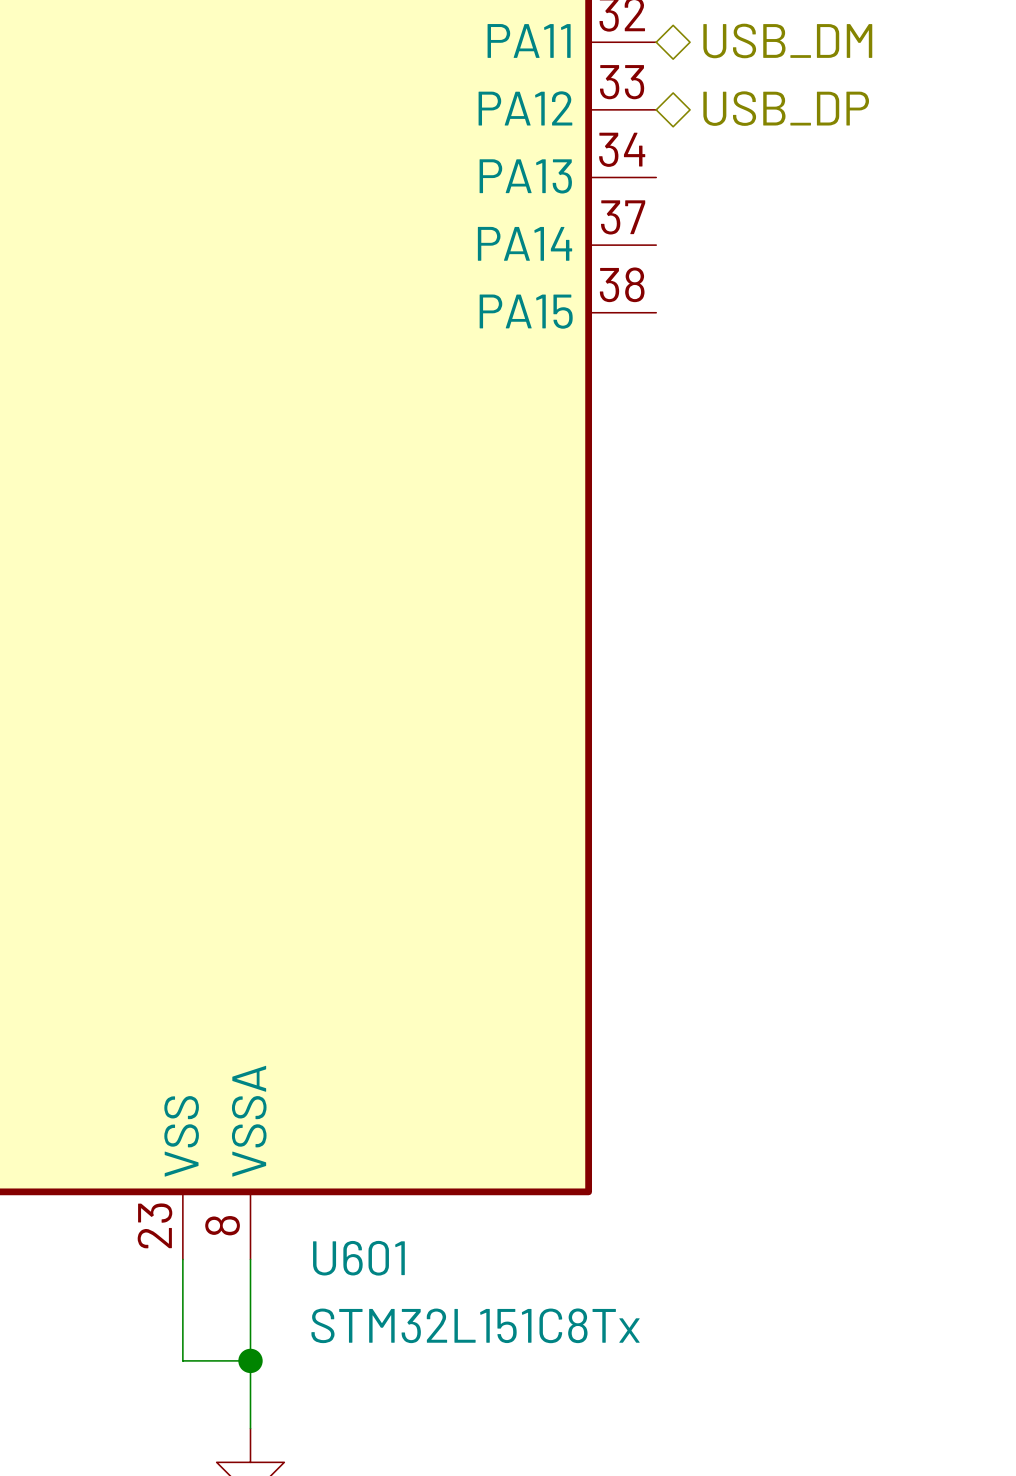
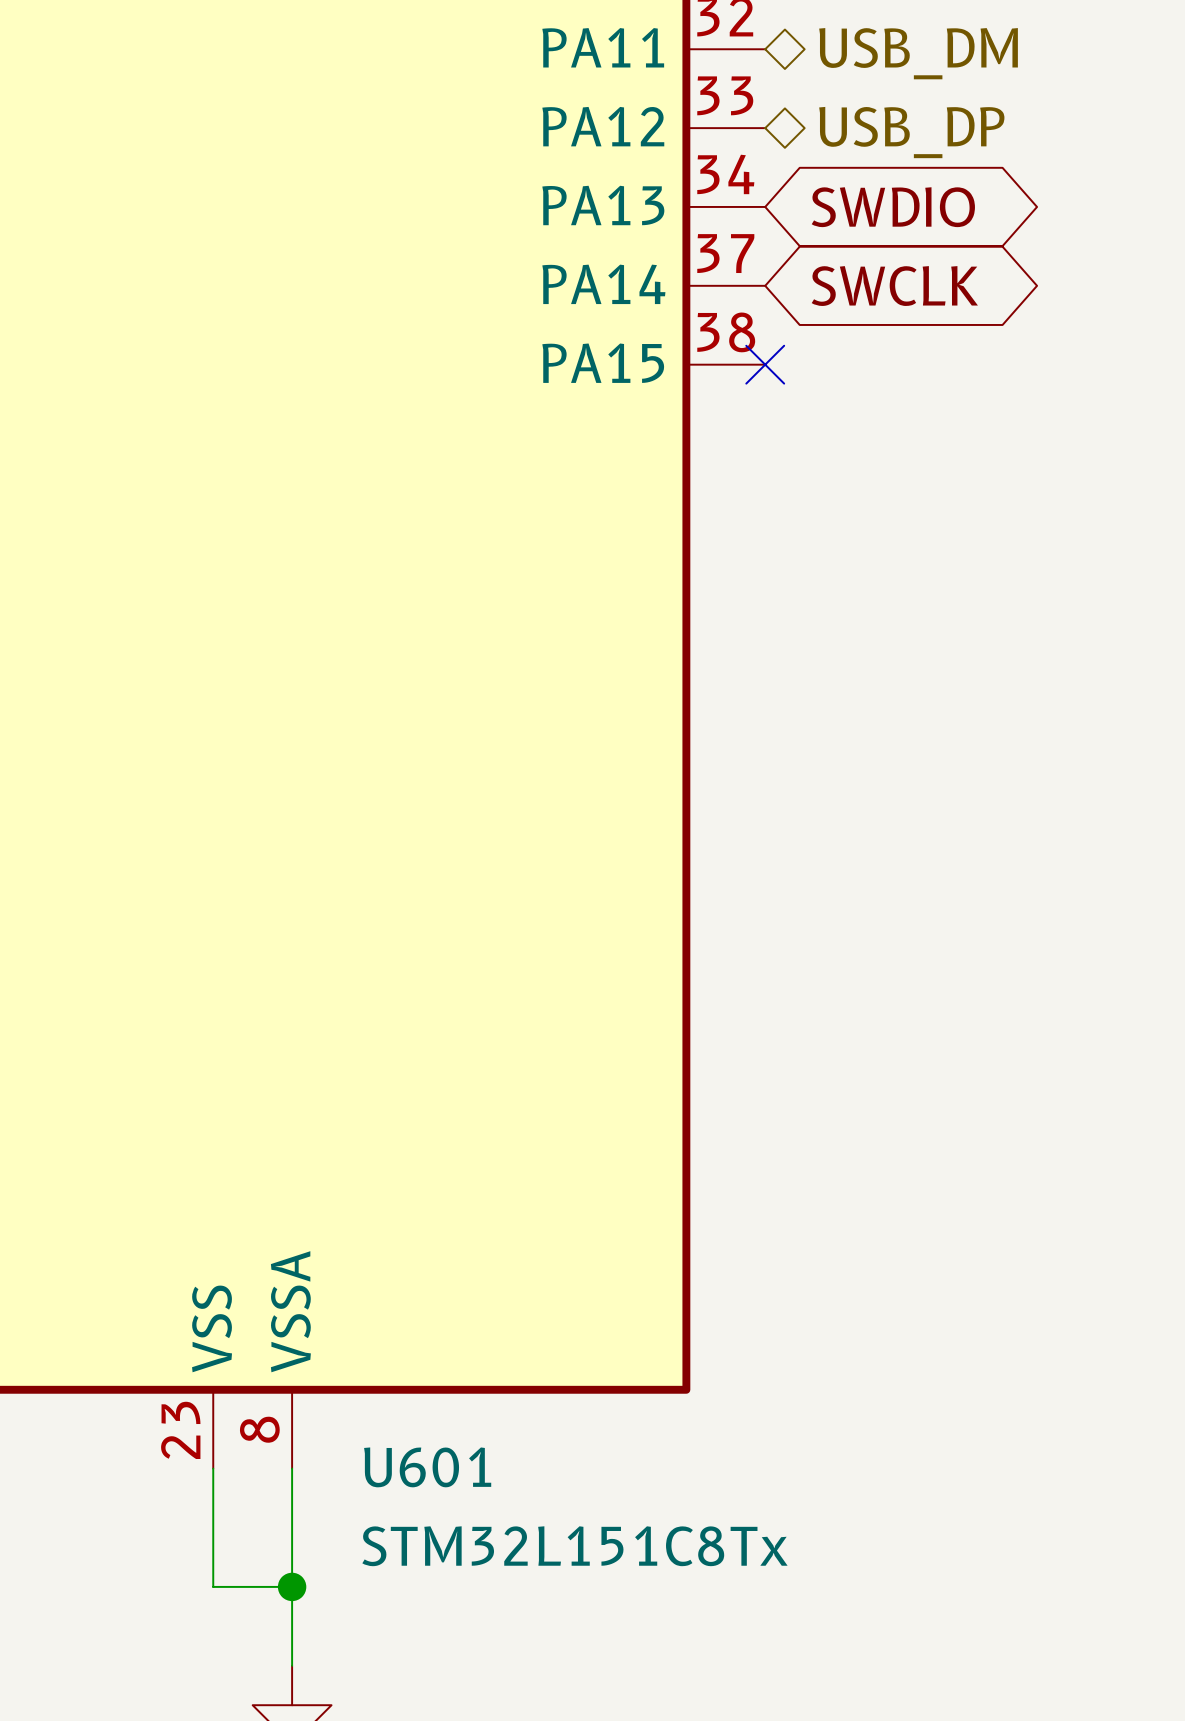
global label: none -> SWDIO (893, 207)
global label: none -> SWCLK (894, 286)
no-connect mark: none -> (765, 364)

